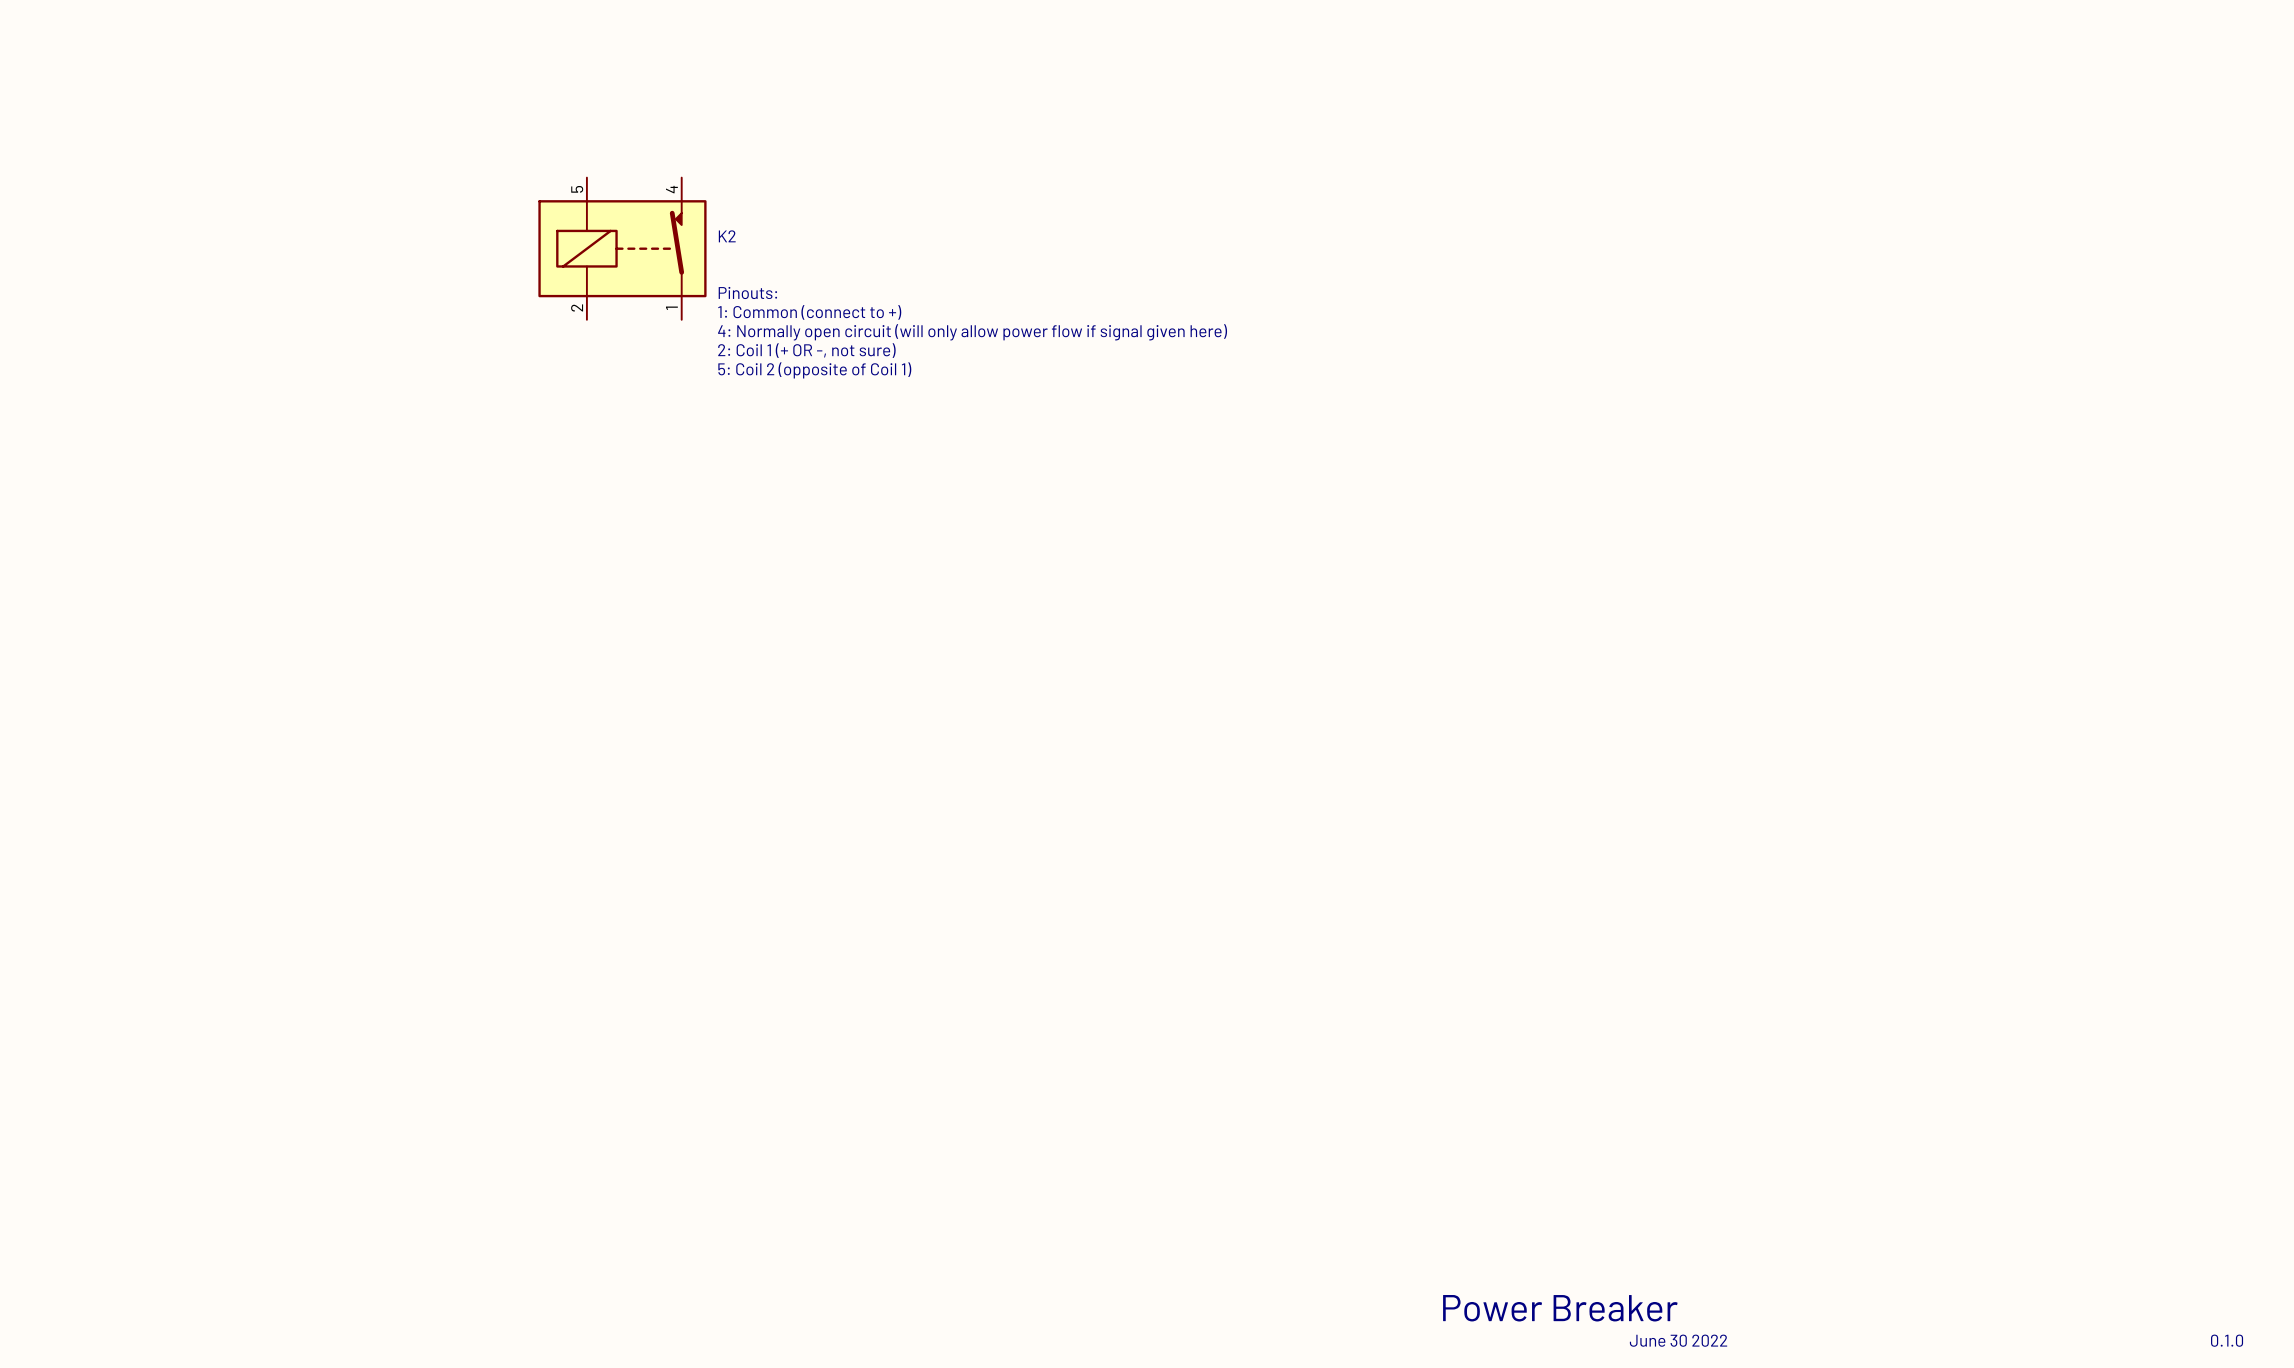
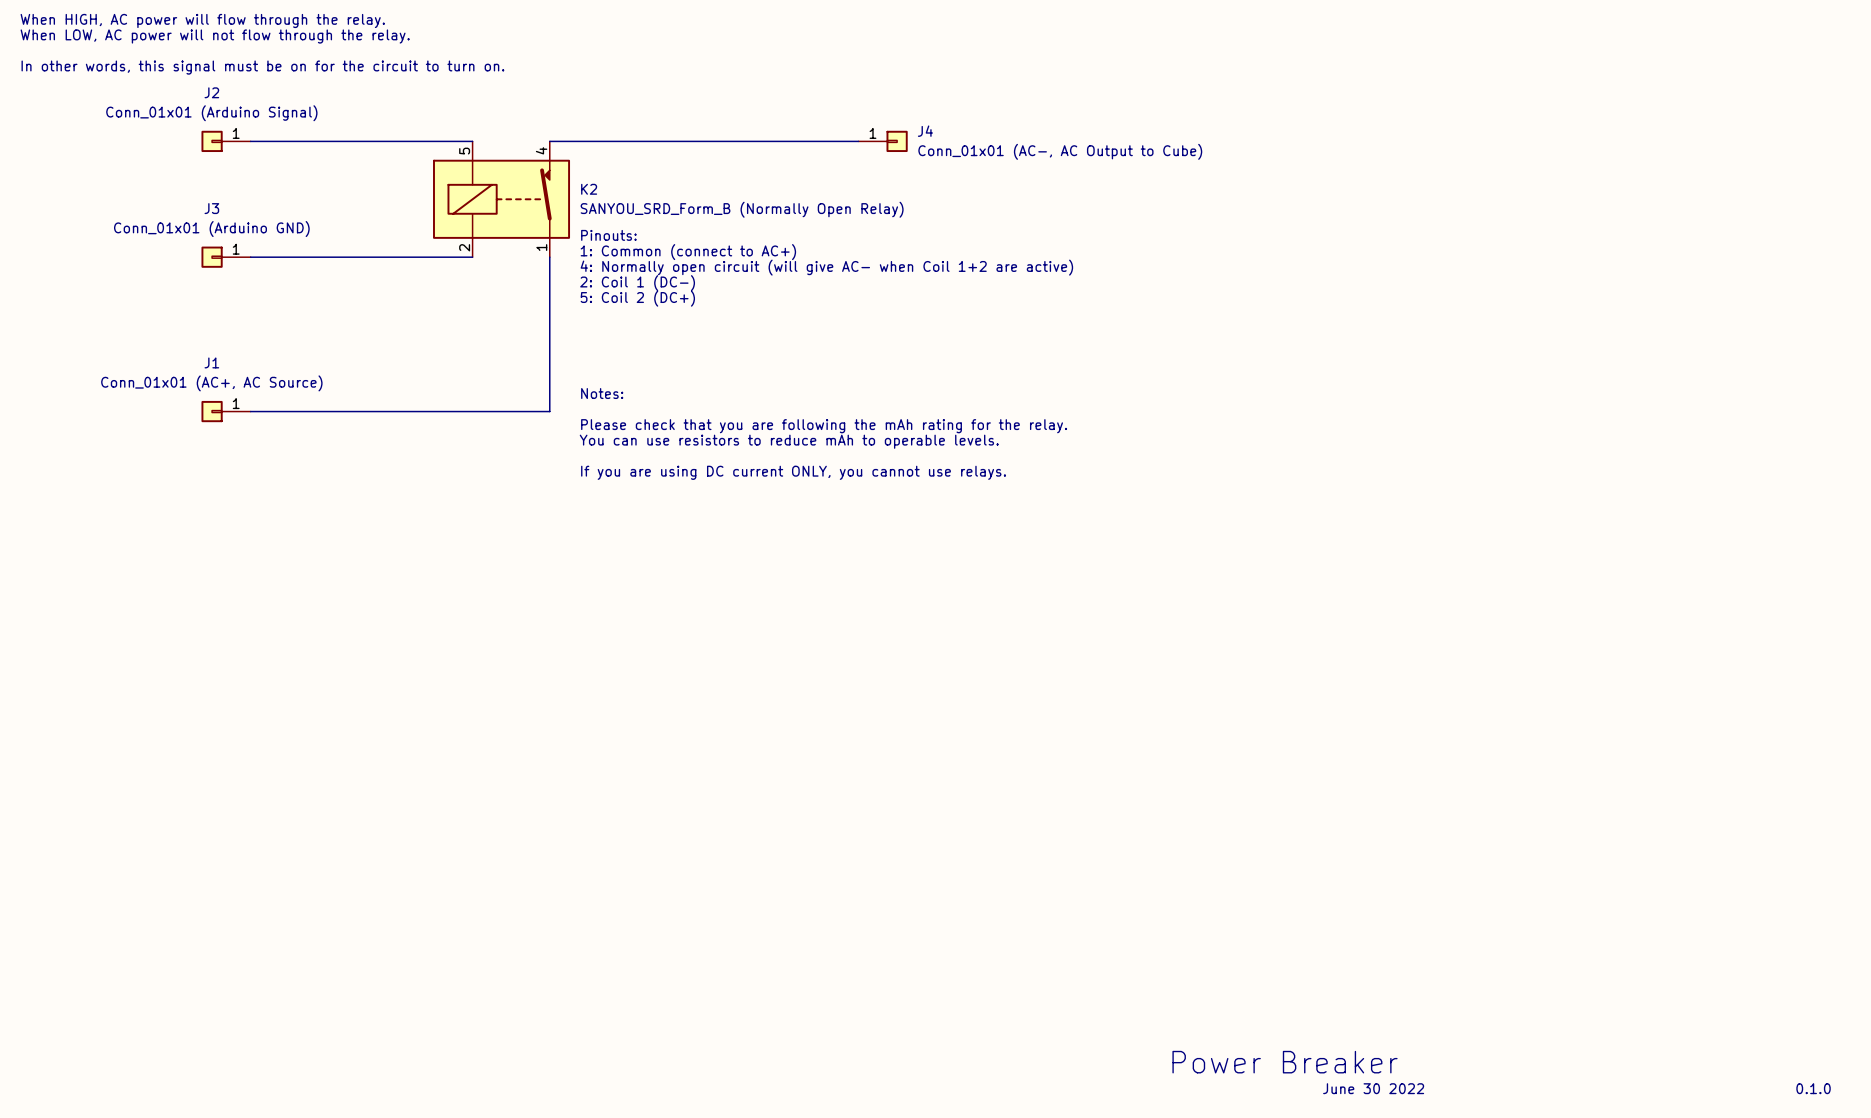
text: none -> When HIGH, AC power will flow through the relay. (202, 20)
text: none -> When LOW, AC power will not flow through the relay. (215, 36)
text: none -> In other words, this signal must be on for the circuit to turn on. (262, 67)
J2: none -> Conn_01x01 (Arduino Signal) (226, 141)
wire: none -> (250, 141) (472, 141)
wire: none -> (549, 141) (858, 141)
J4: none -> Conn_01x01 (AC-, AC Output to Cube) (883, 141)
K2 value: none -> SANYOU_SRD_Form_B (Normally Open Relay) (742, 209)
text: 1: Common (connect to +) (809, 312) -> 1: Common (connect to AC+) (688, 252)
J3: none -> Conn_01x01 (Arduino GND) (226, 257)
wire: none -> (250, 257) (472, 257)
wire: none -> (549, 257) (549, 411) (250, 411)
text: 4: Normally open circuit (will only allow power flow if signal given here) (972, 332) -> 4: Normally open circuit (will give AC- when Coil 1+2 are active) (826, 267)
text: 2: Coil 1 (+ OR -, not sure) (806, 350) -> 2: Coil 1 (DC-) (637, 283)
text: 5: Coil 2 (opposite of Coil 1) (814, 370) -> 5: Coil 2 (DC+) (637, 298)
text: none -> Notes: (602, 393)
J1: none -> Conn_01x01 (AC+, AC Source) (226, 411)
text: none -> Please check that you are following the mAh rating for the relay. (824, 426)
text: none -> You can use resistors to reduce mAh to operable levels. (789, 441)
text: none -> If you are using DC current ONLY, you cannot use relays. (793, 472)

